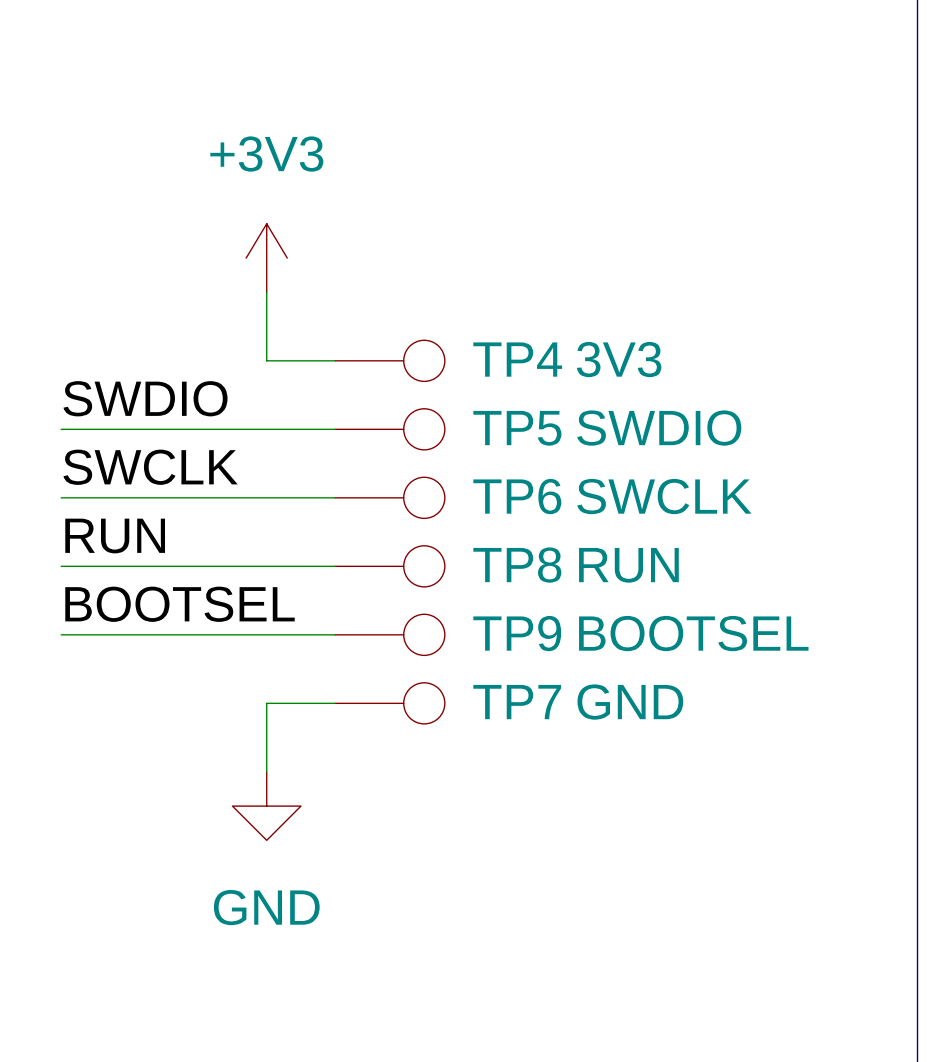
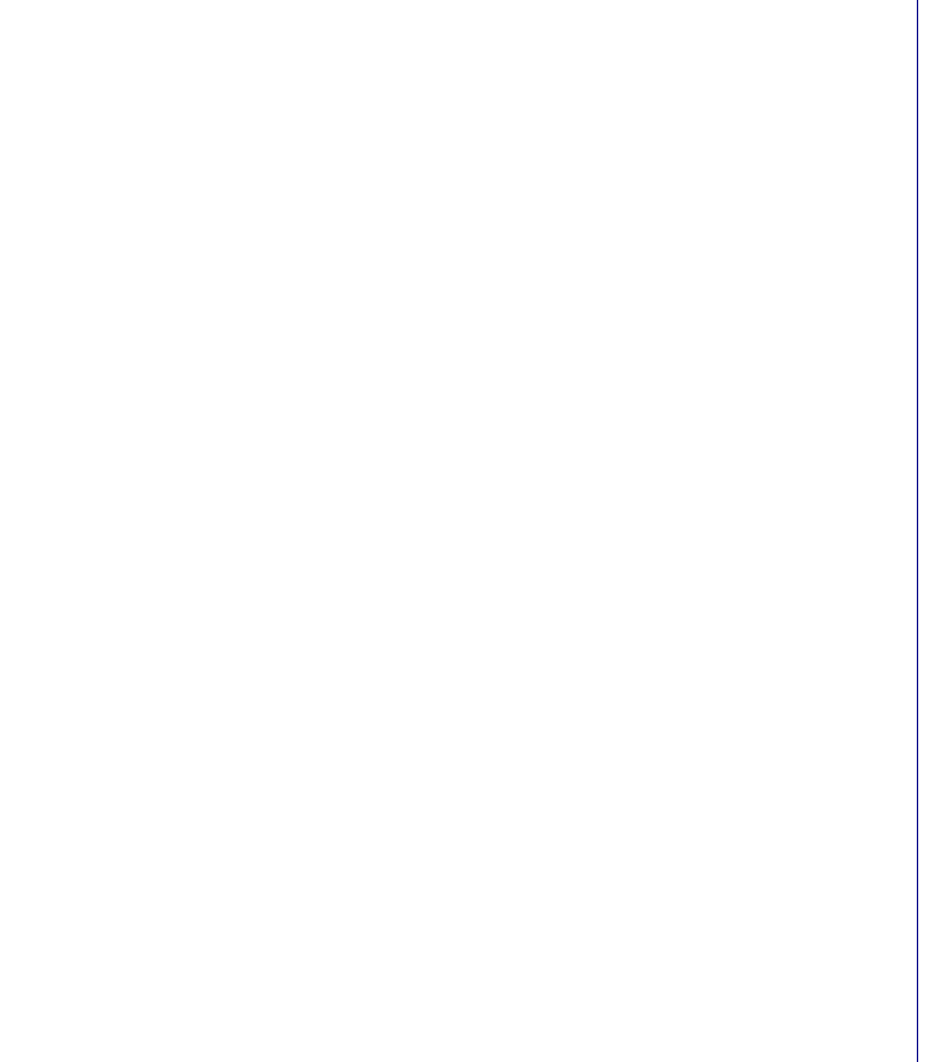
power symbol: +3V3 (266, 258) -> none
wire: (266, 292) (266, 360) (335, 360) -> none
TP4: 3V3 (390, 360) -> none
label: SWDIO (145, 398) -> none
wire: (61, 429) (335, 429) -> none
TP5: SWDIO (390, 429) -> none
label: SWCLK (150, 467) -> none
wire: (61, 497) (335, 497) -> none
TP6: SWCLK (390, 497) -> none
label: RUN (115, 536) -> none
wire: (61, 566) (335, 566) -> none
TP8: RUN (390, 566) -> none
label: BOOTSEL (180, 604) -> none
wire: (61, 634) (335, 634) -> none
TP9: BOOTSEL (390, 634) -> none
wire: (335, 703) (266, 703) (266, 771) -> none
TP7: GND (390, 703) -> none
power symbol: GND (266, 806) -> none

